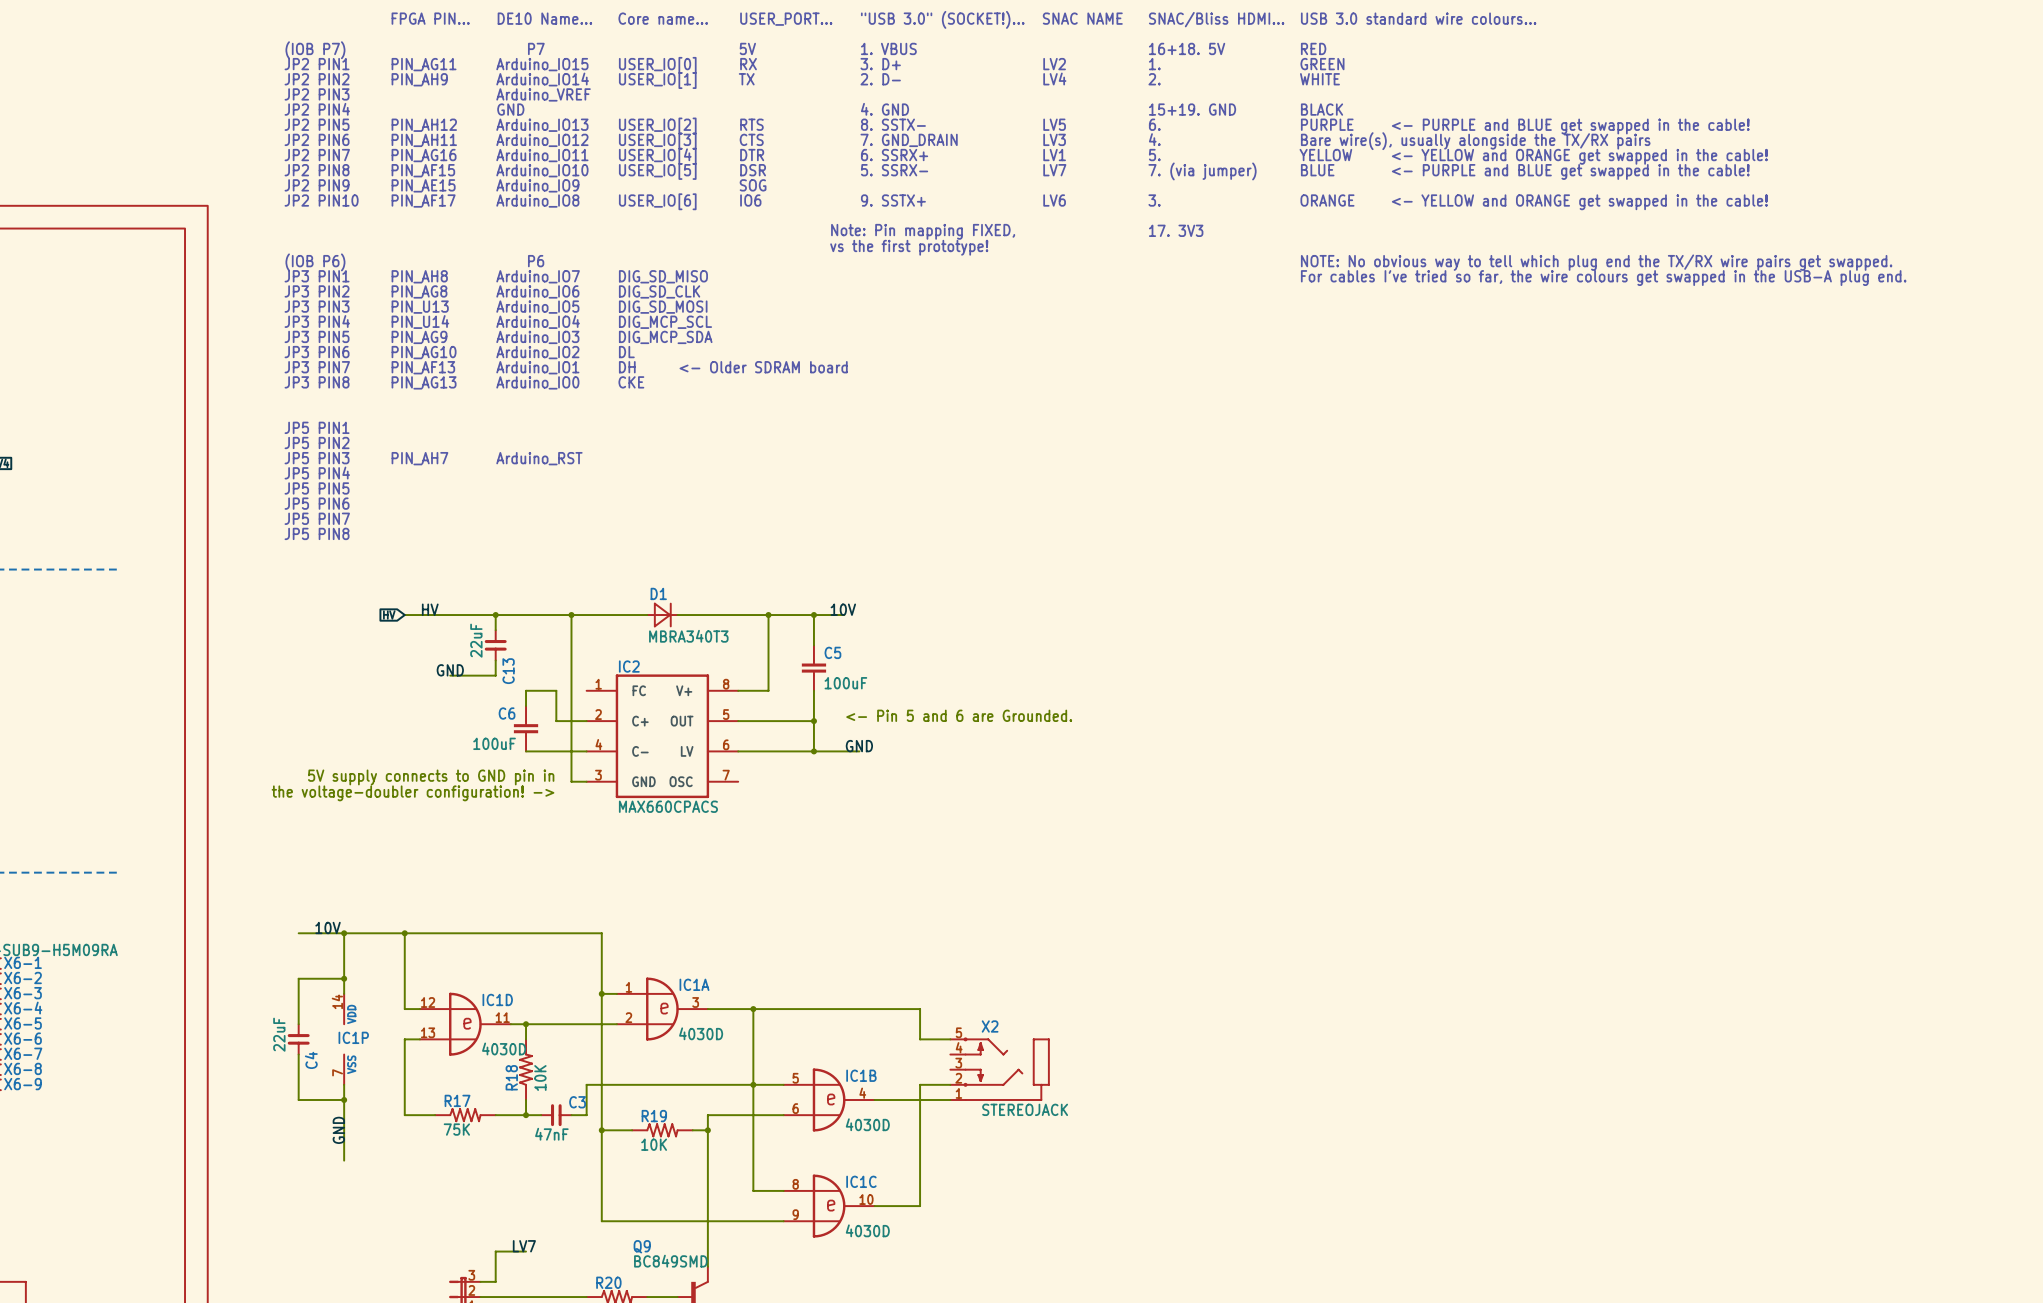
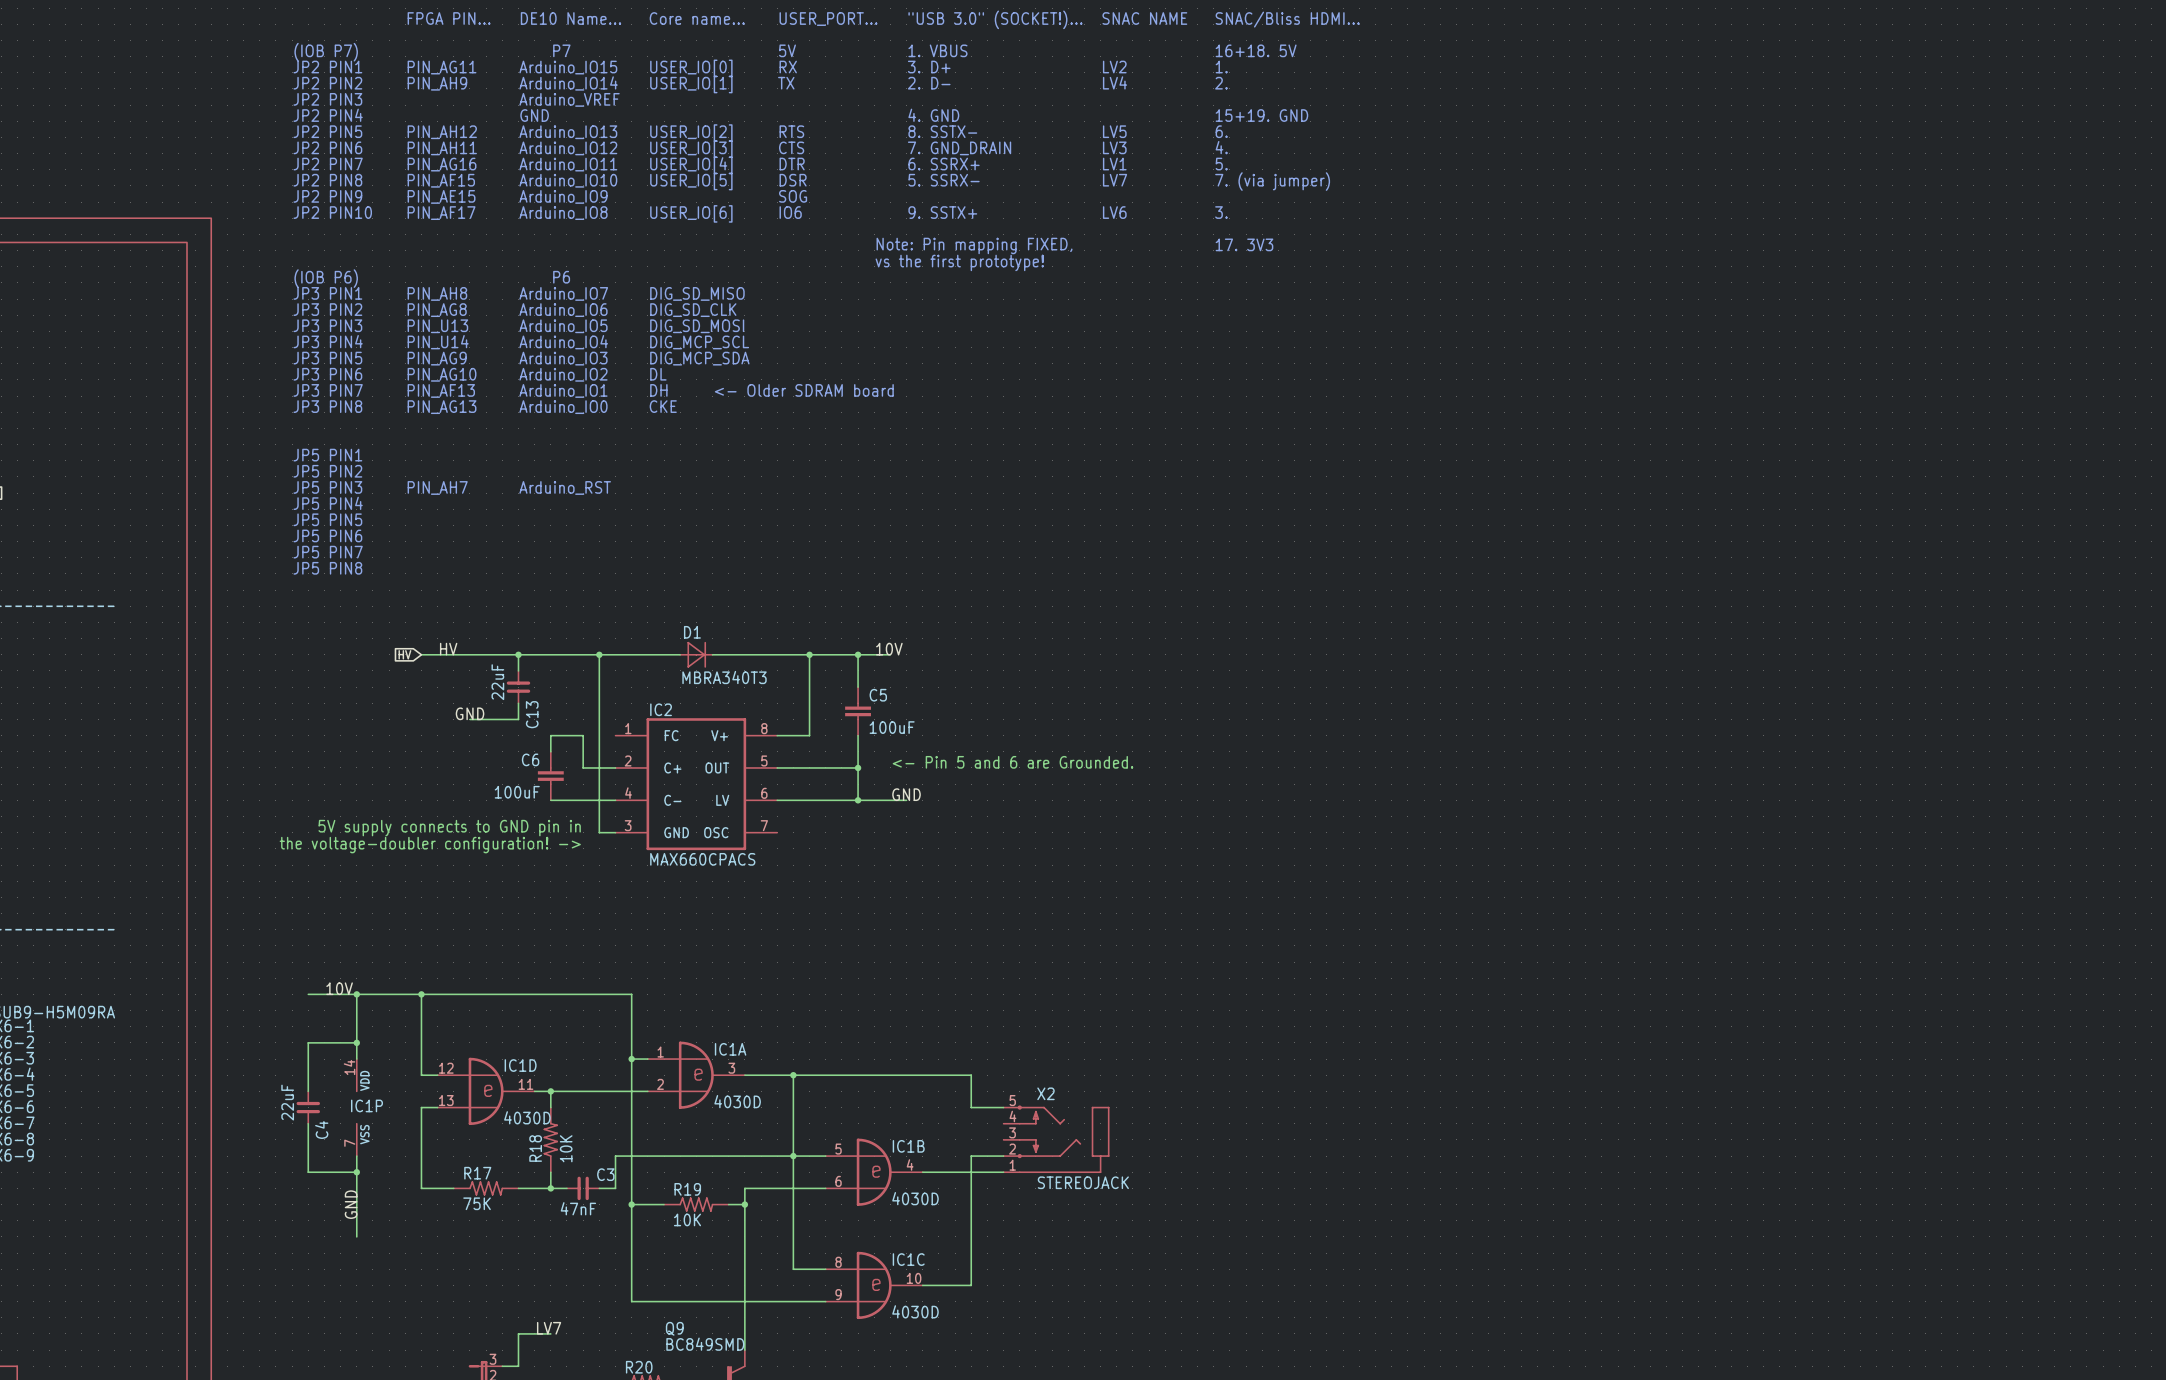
text: USB 3.0 standard wire colours... (1418, 18) -> none
text: RED (1313, 48) -> none
text: GREEN (1322, 64) -> none
text: WHITE (1319, 79) -> none
text: BLACK (1322, 109) -> none
text: PURPLE (1327, 124) -> none
text: <- PURPLE and BLUE get swapped in the cable! (1570, 126) -> none
text: Bare wire(s), usually alongside the TX/RX pairs (1475, 141) -> none
text: YELLOW (1325, 155) -> none
text: <- YELLOW and ORANGE get swapped in the cable! (1579, 156) -> none
text: BLUE (1317, 170) -> none
text: <- PURPLE and BLUE get swapped in the cable! (1570, 171) -> none
text: ORANGE (1327, 200) -> none
text: <- YELLOW and ORANGE get swapped in the cable! (1579, 202) -> none
text: NOTE: No obvious way to tell which plug end the TX/RX wire pairs get swapped. (1596, 262) -> none
text: For cables I've tried so far, the wire colours get swapped in the USB-A plug end. (1603, 278) -> none

